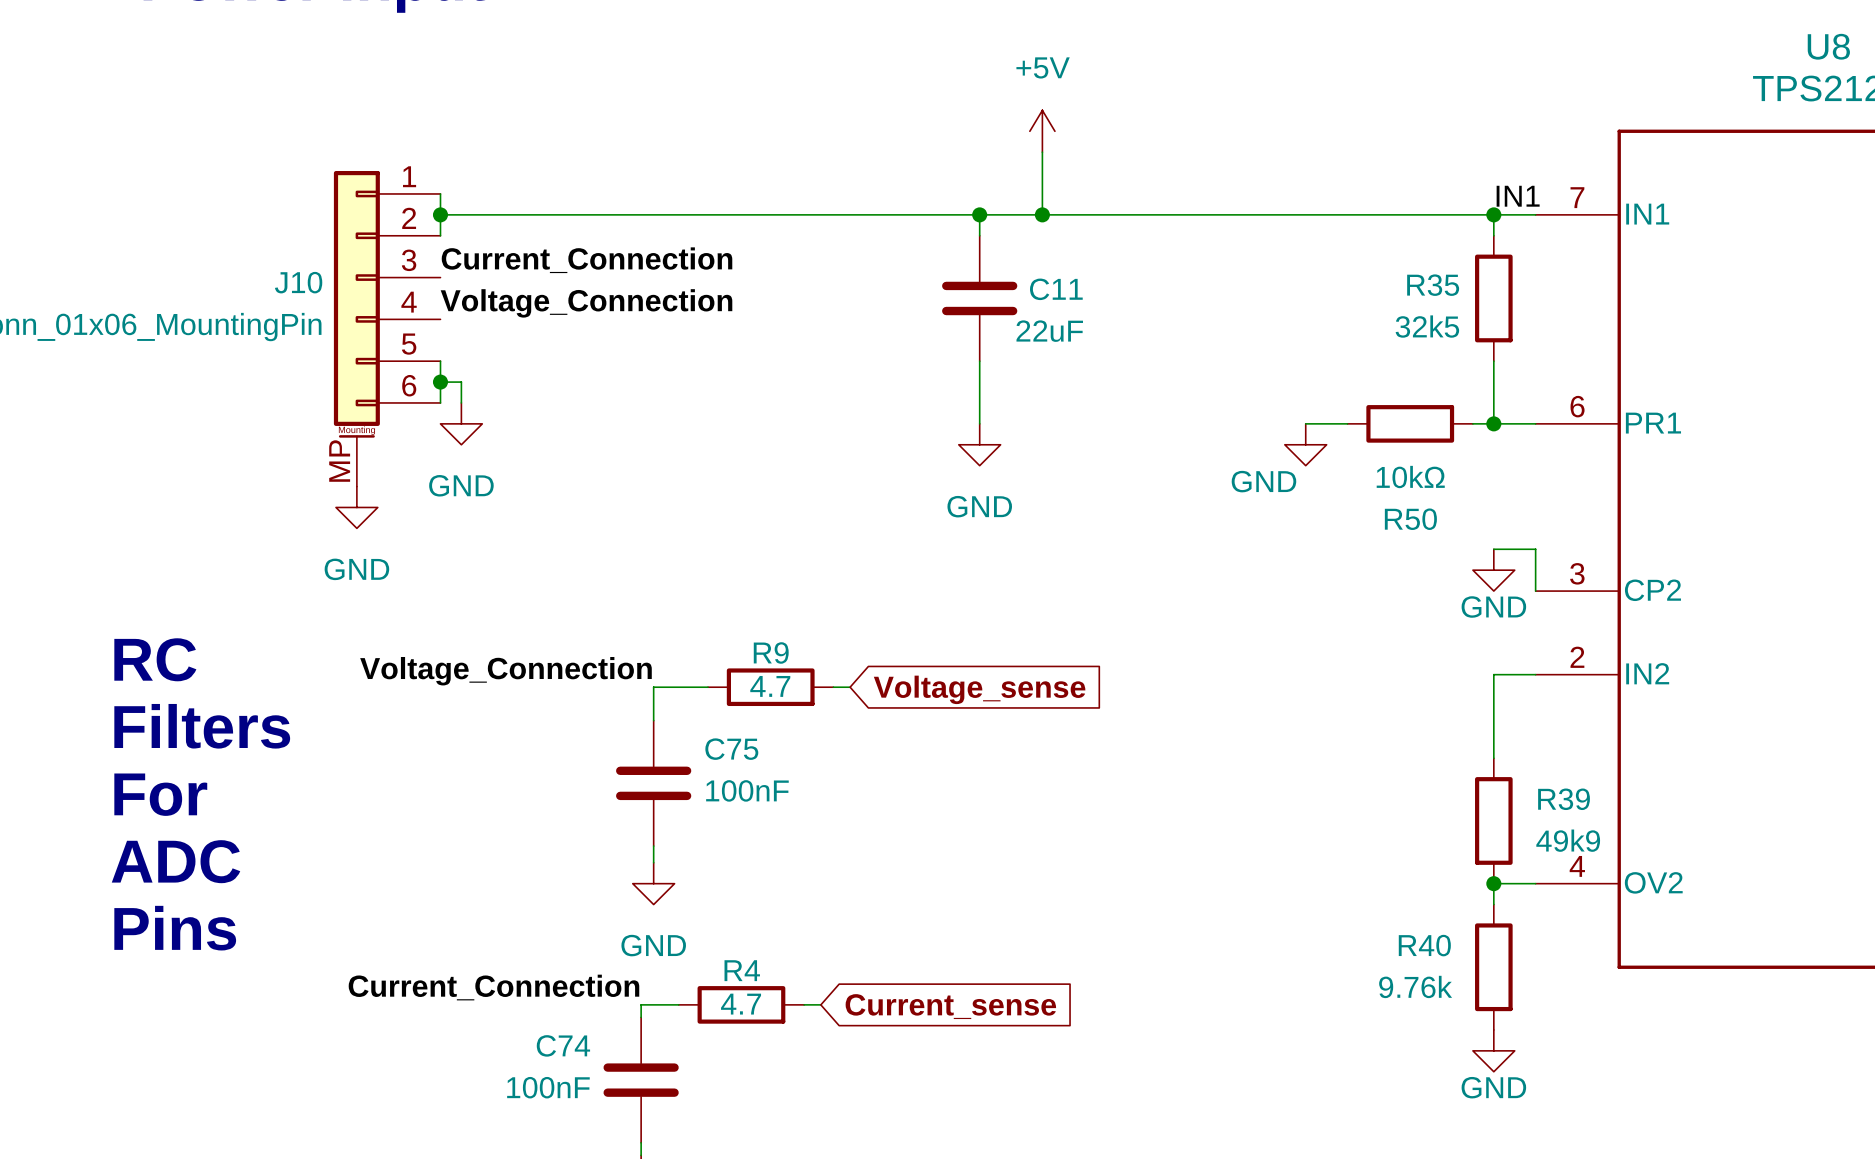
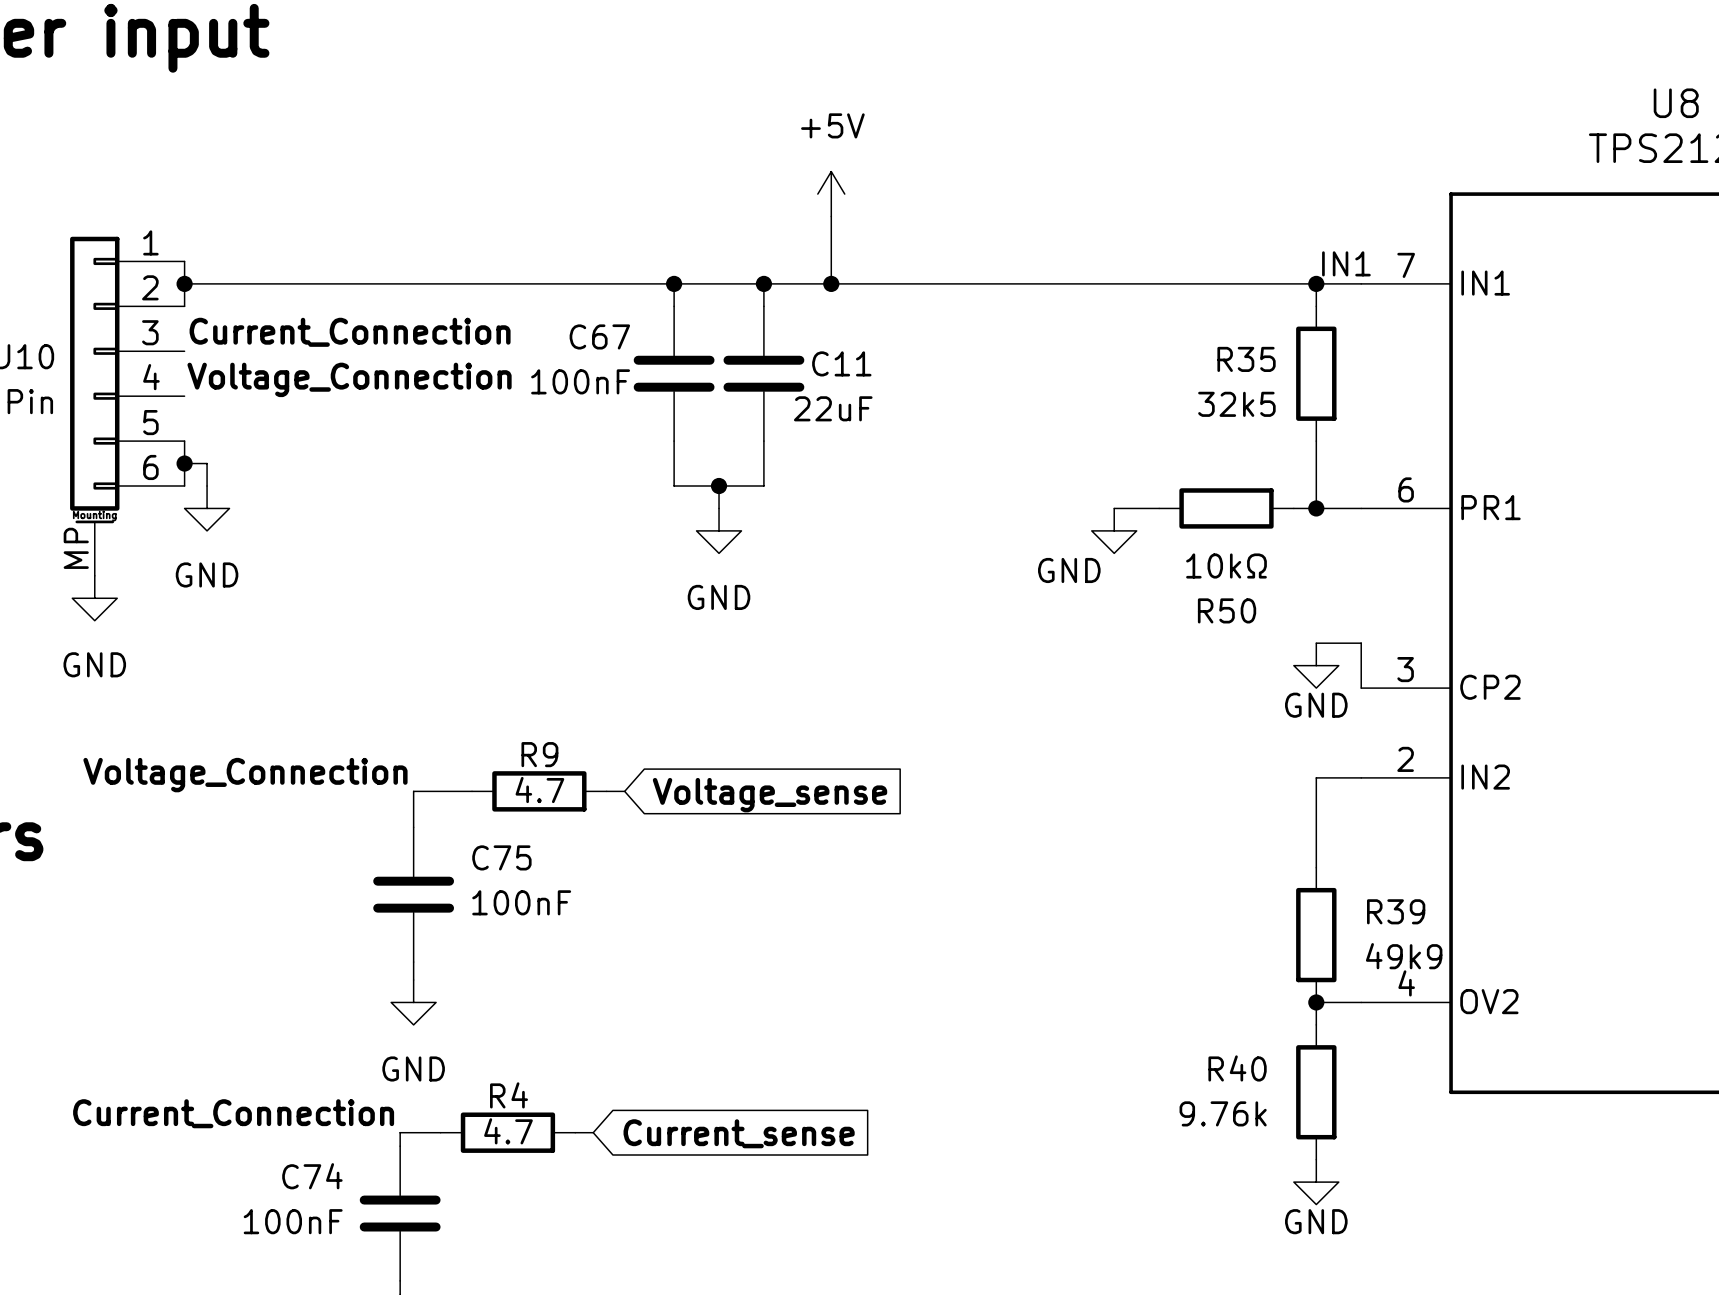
wire: none -> (674, 283) (674, 306)
junction: none -> (674, 283)
C67: none -> 100nF (674, 373)
wire: none -> (719, 486) (719, 508)
junction: none -> (719, 486)
wire: (979, 402) (979, 423) -> (763, 486) (674, 486) (674, 441)
power symbol position: GND (979, 444) -> GND (719, 530)

